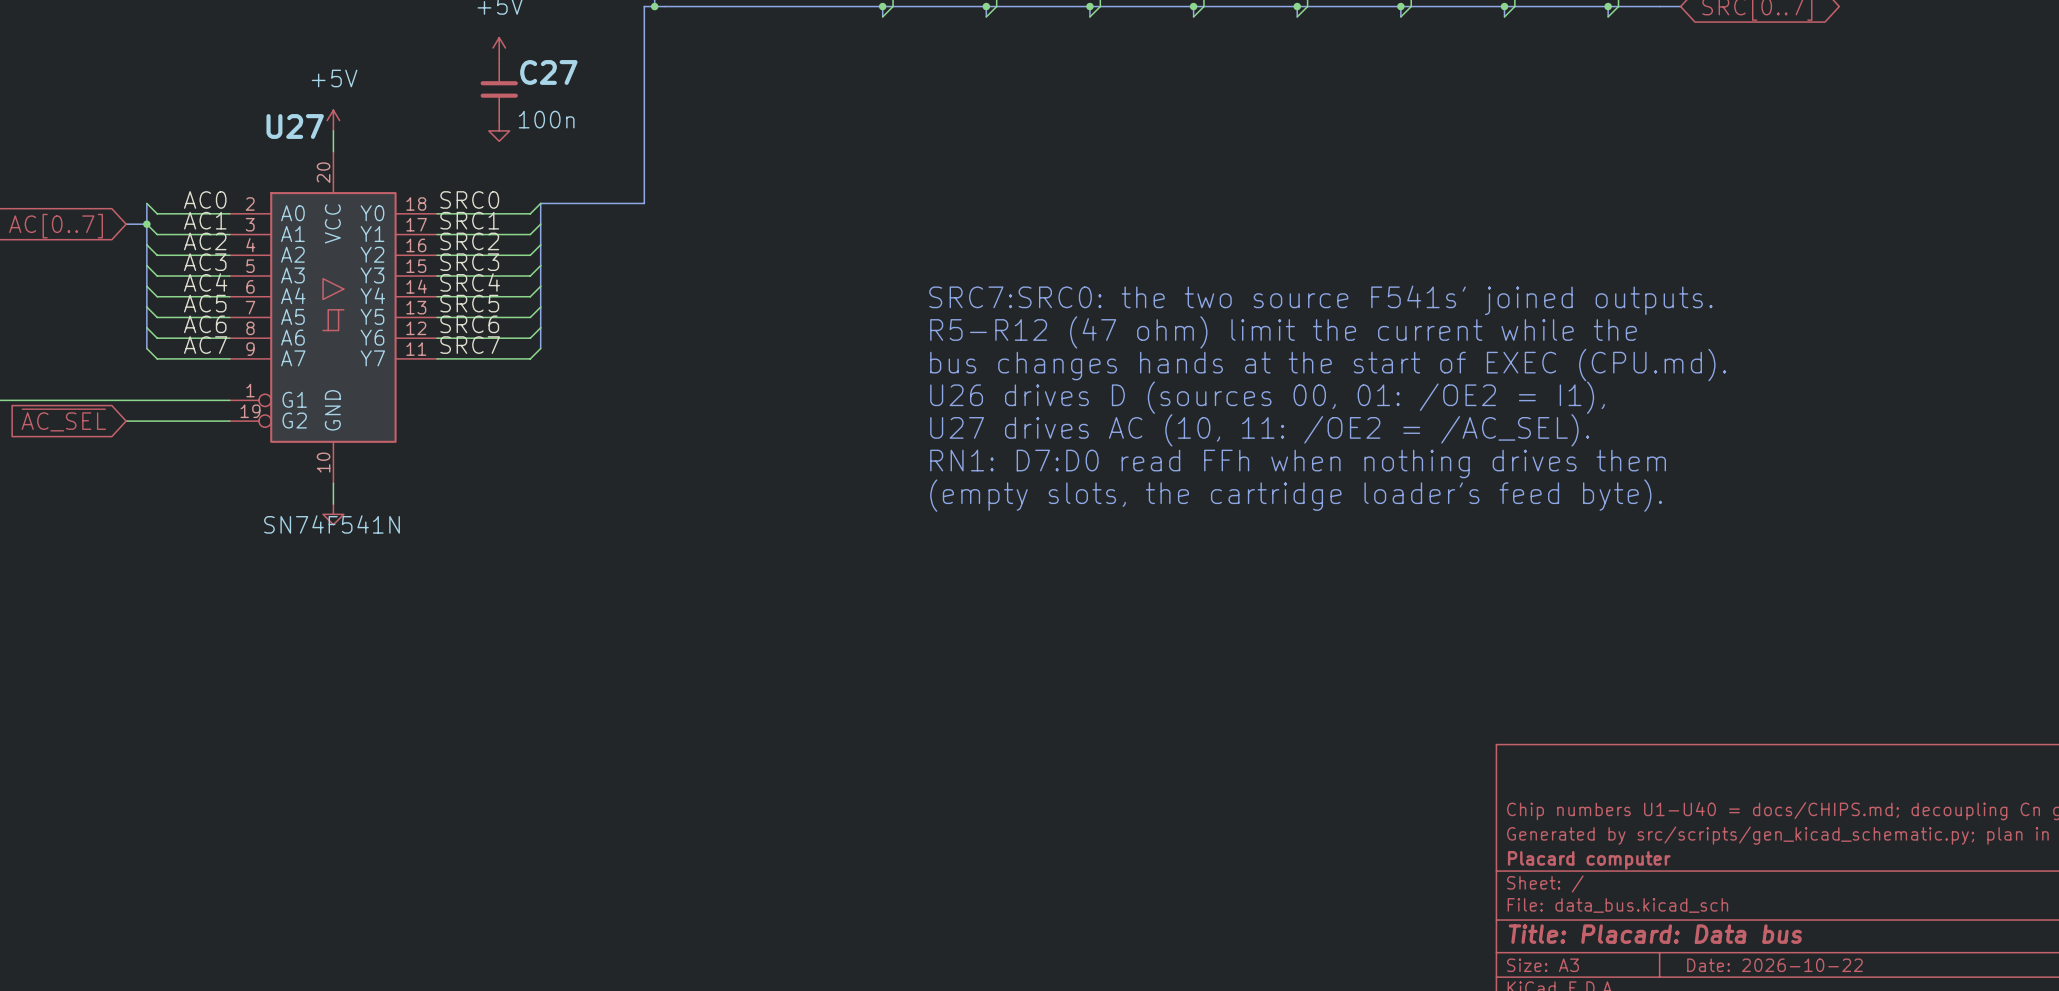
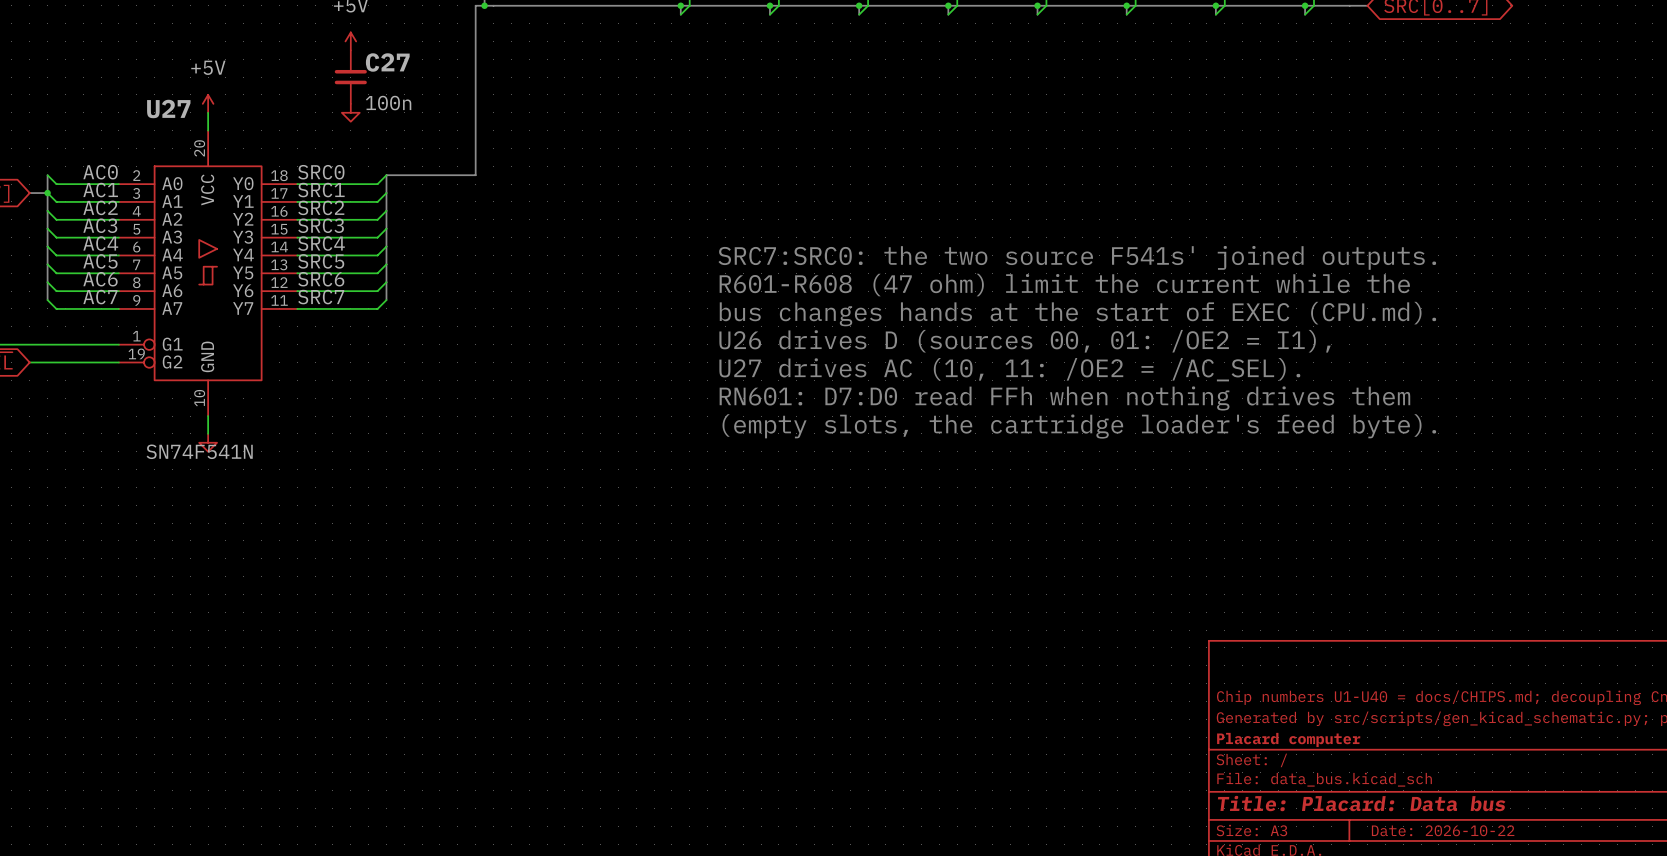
text: R5-R12 (47 ohm) limit the current while the (1283, 332) -> R601-R608 (47 ohm) limit the current while the (1064, 285)
text: RN1: D7:D0 read FFh when nothing drives them (1298, 463) -> RN601: D7:D0 read FFh when nothing drives them (1064, 398)

